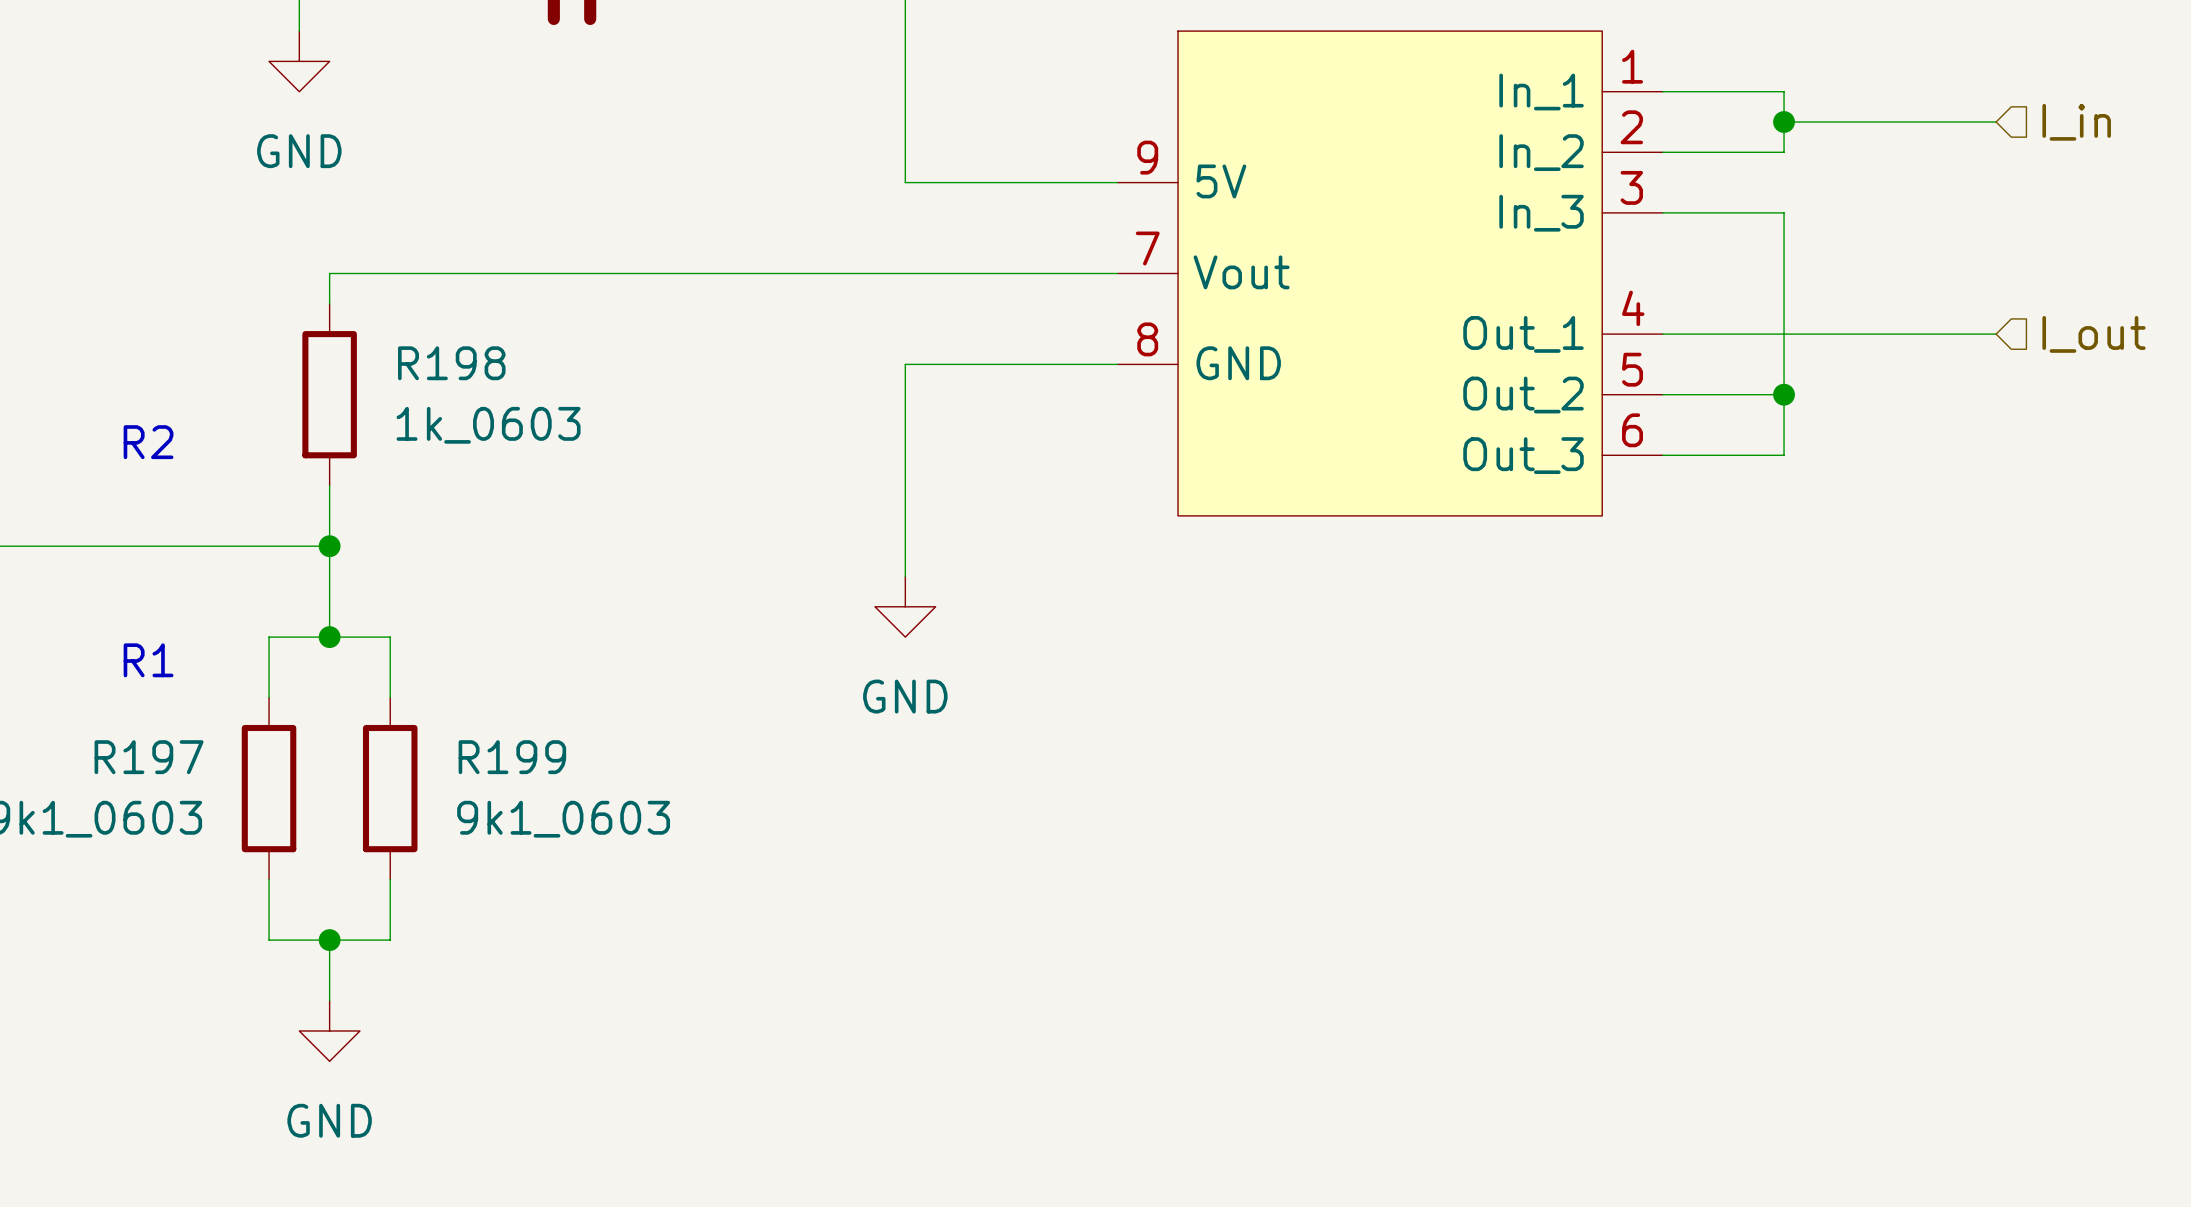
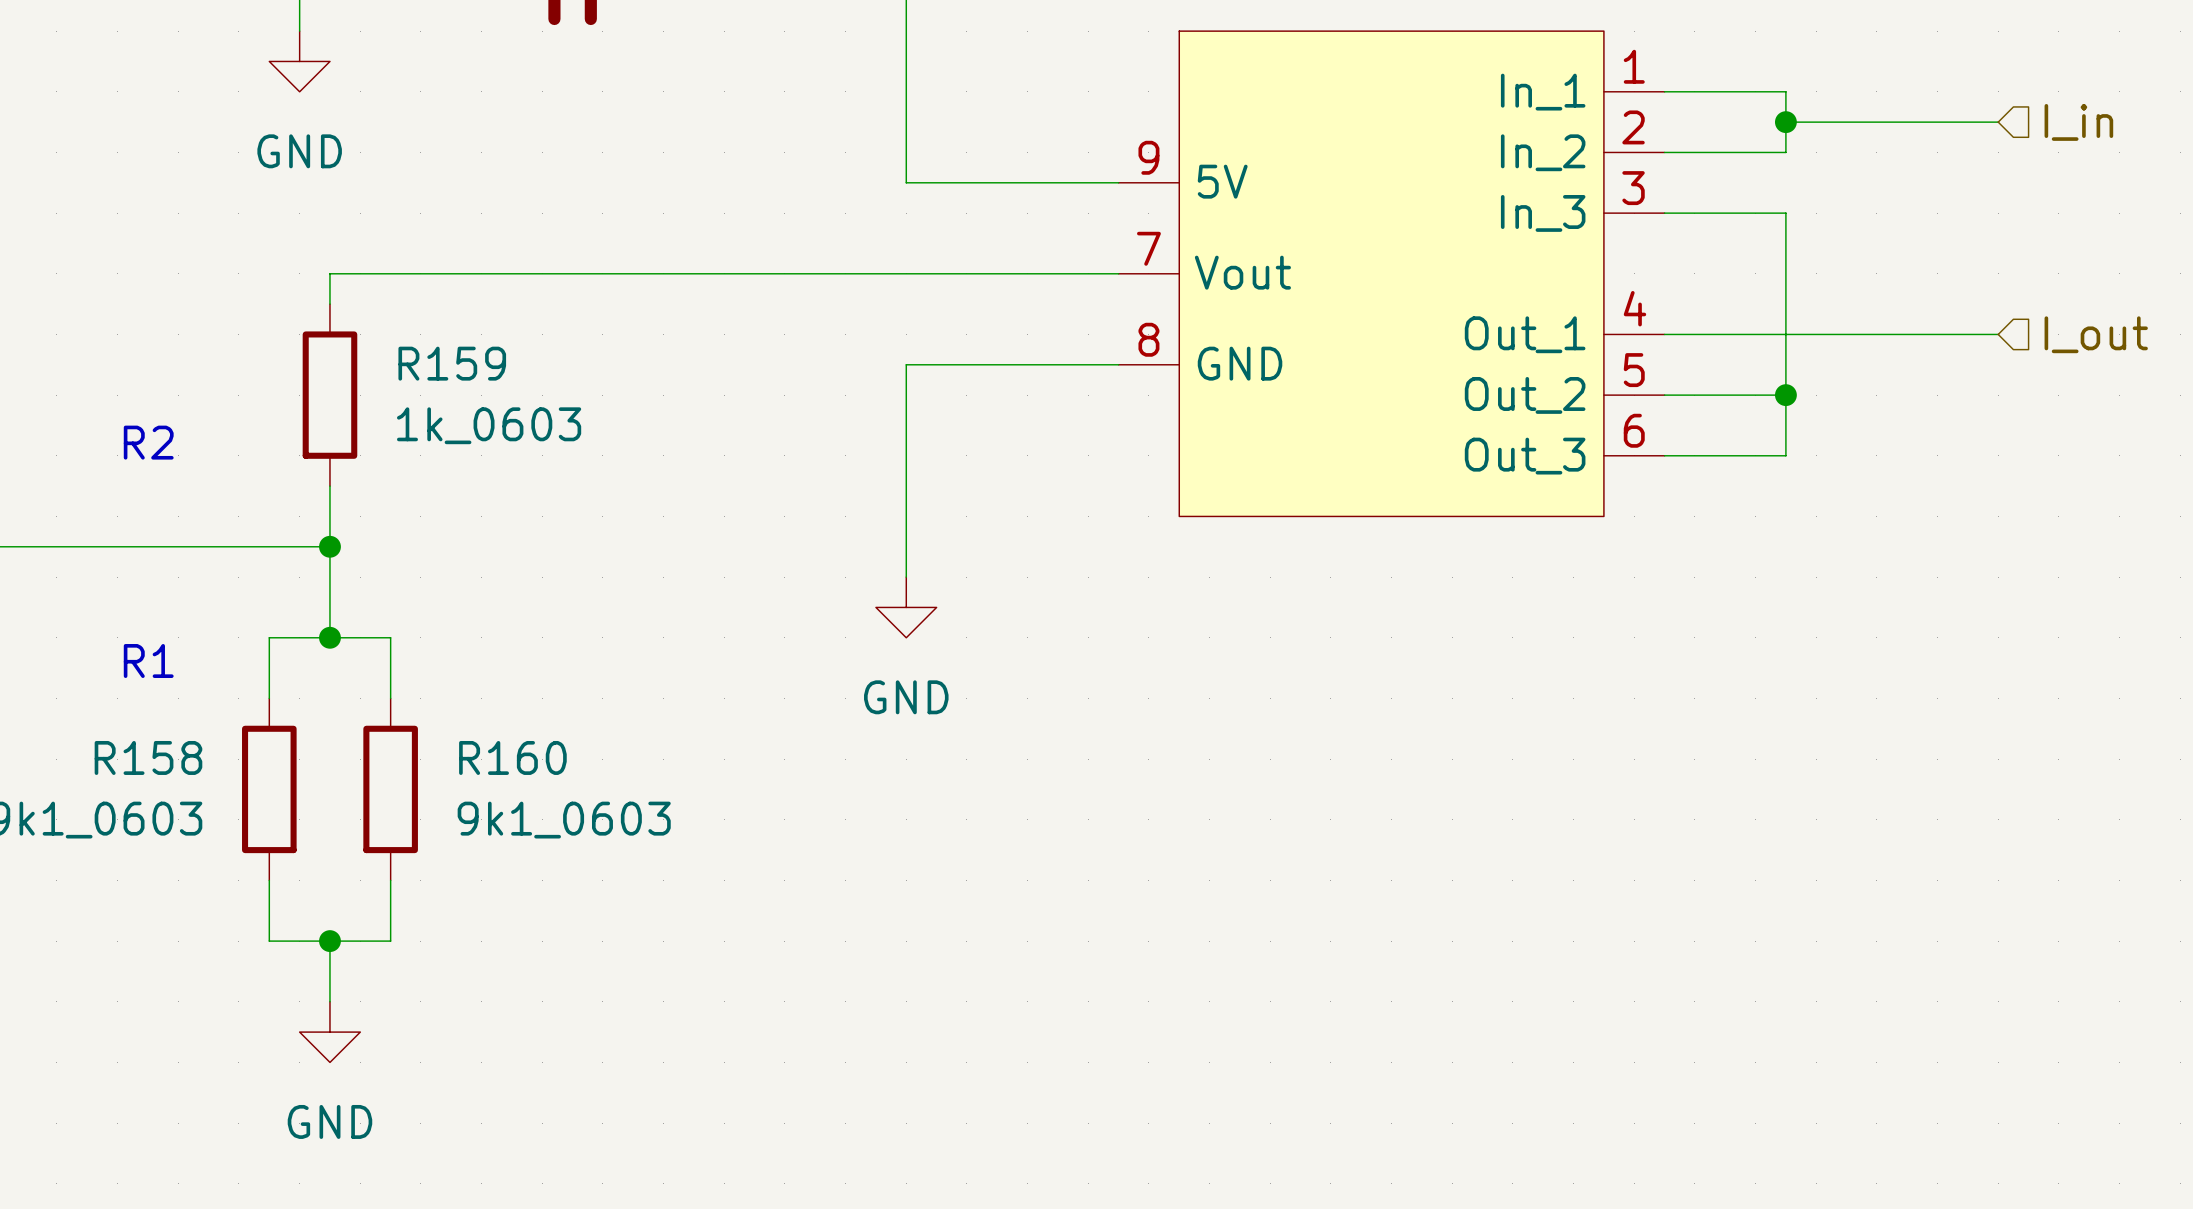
R198 name: R198 (451, 363) -> R159 (452, 363)
R197 name: R197 (149, 757) -> R158 (148, 757)
R199 name: R199 (512, 757) -> R160 (512, 757)

